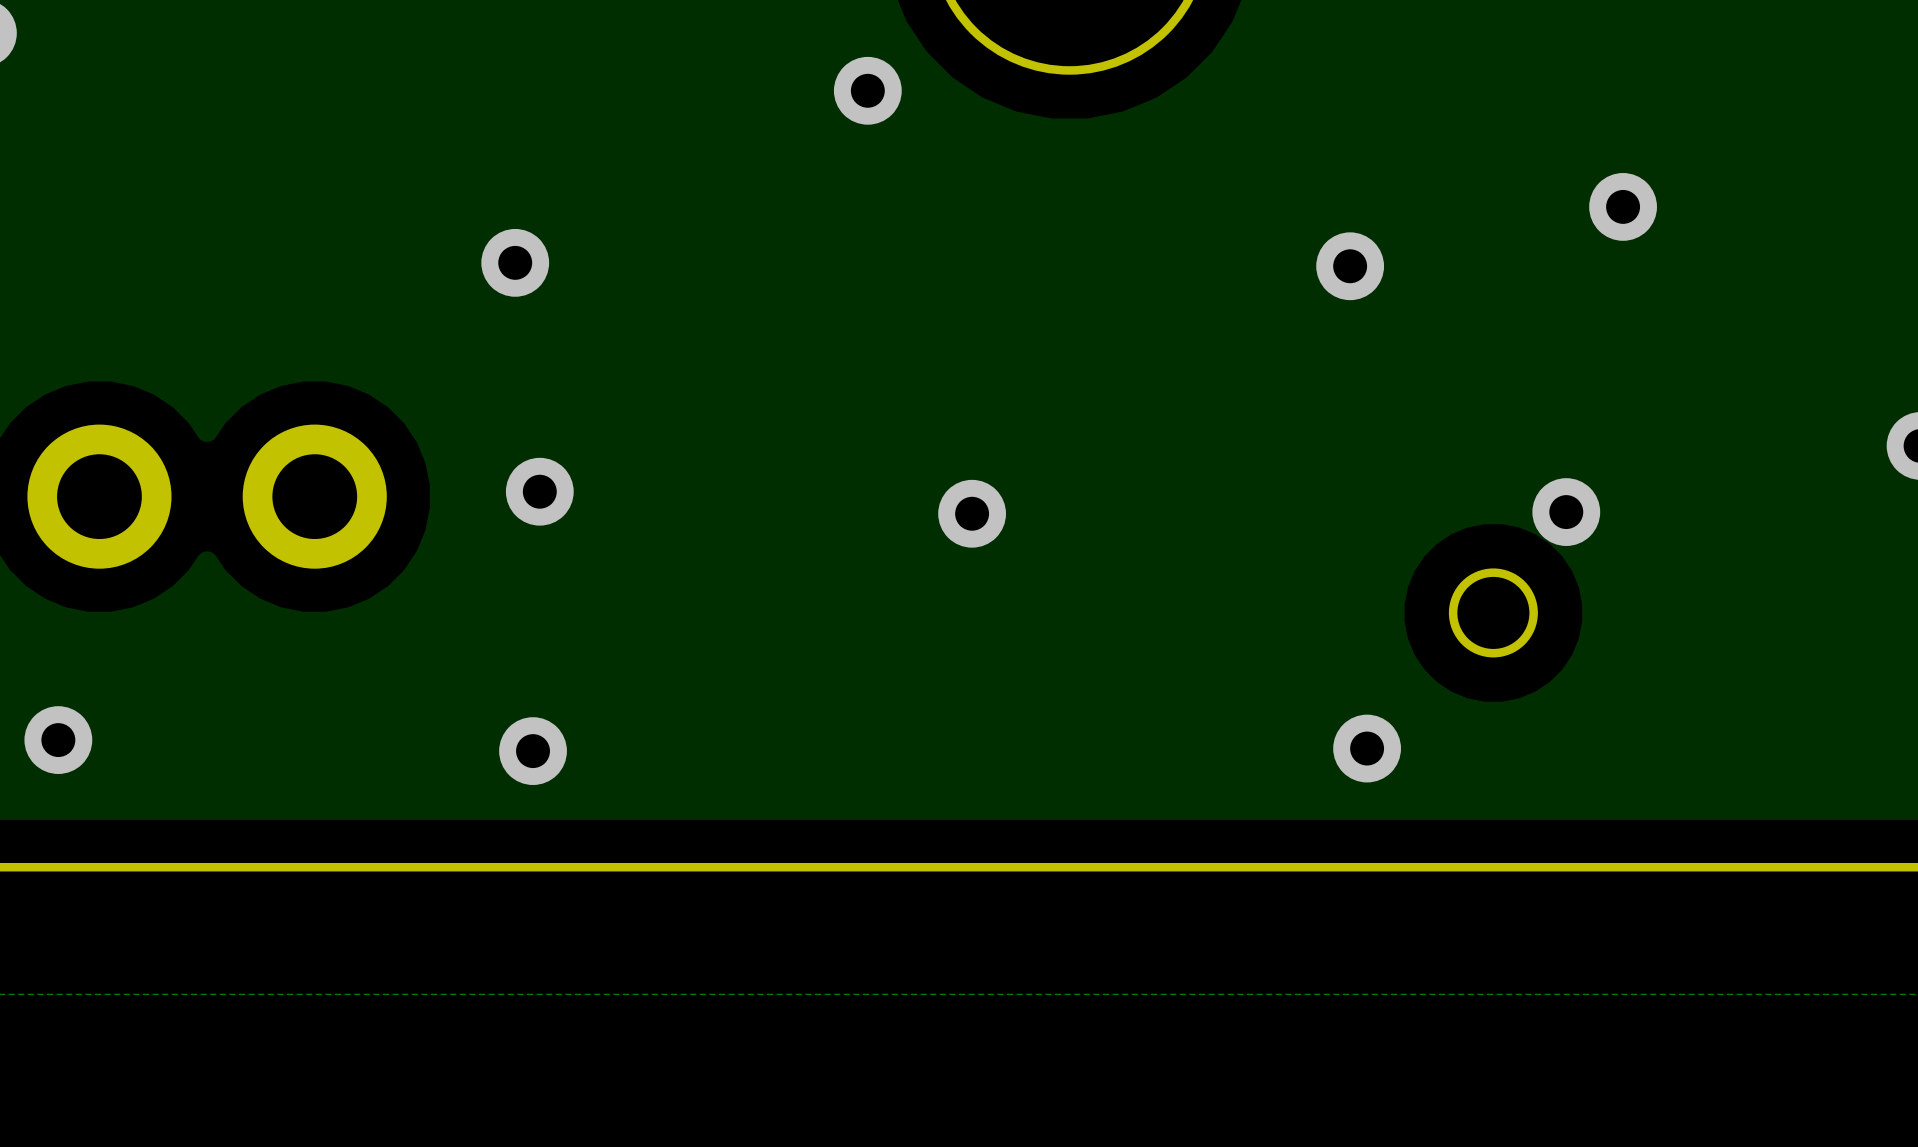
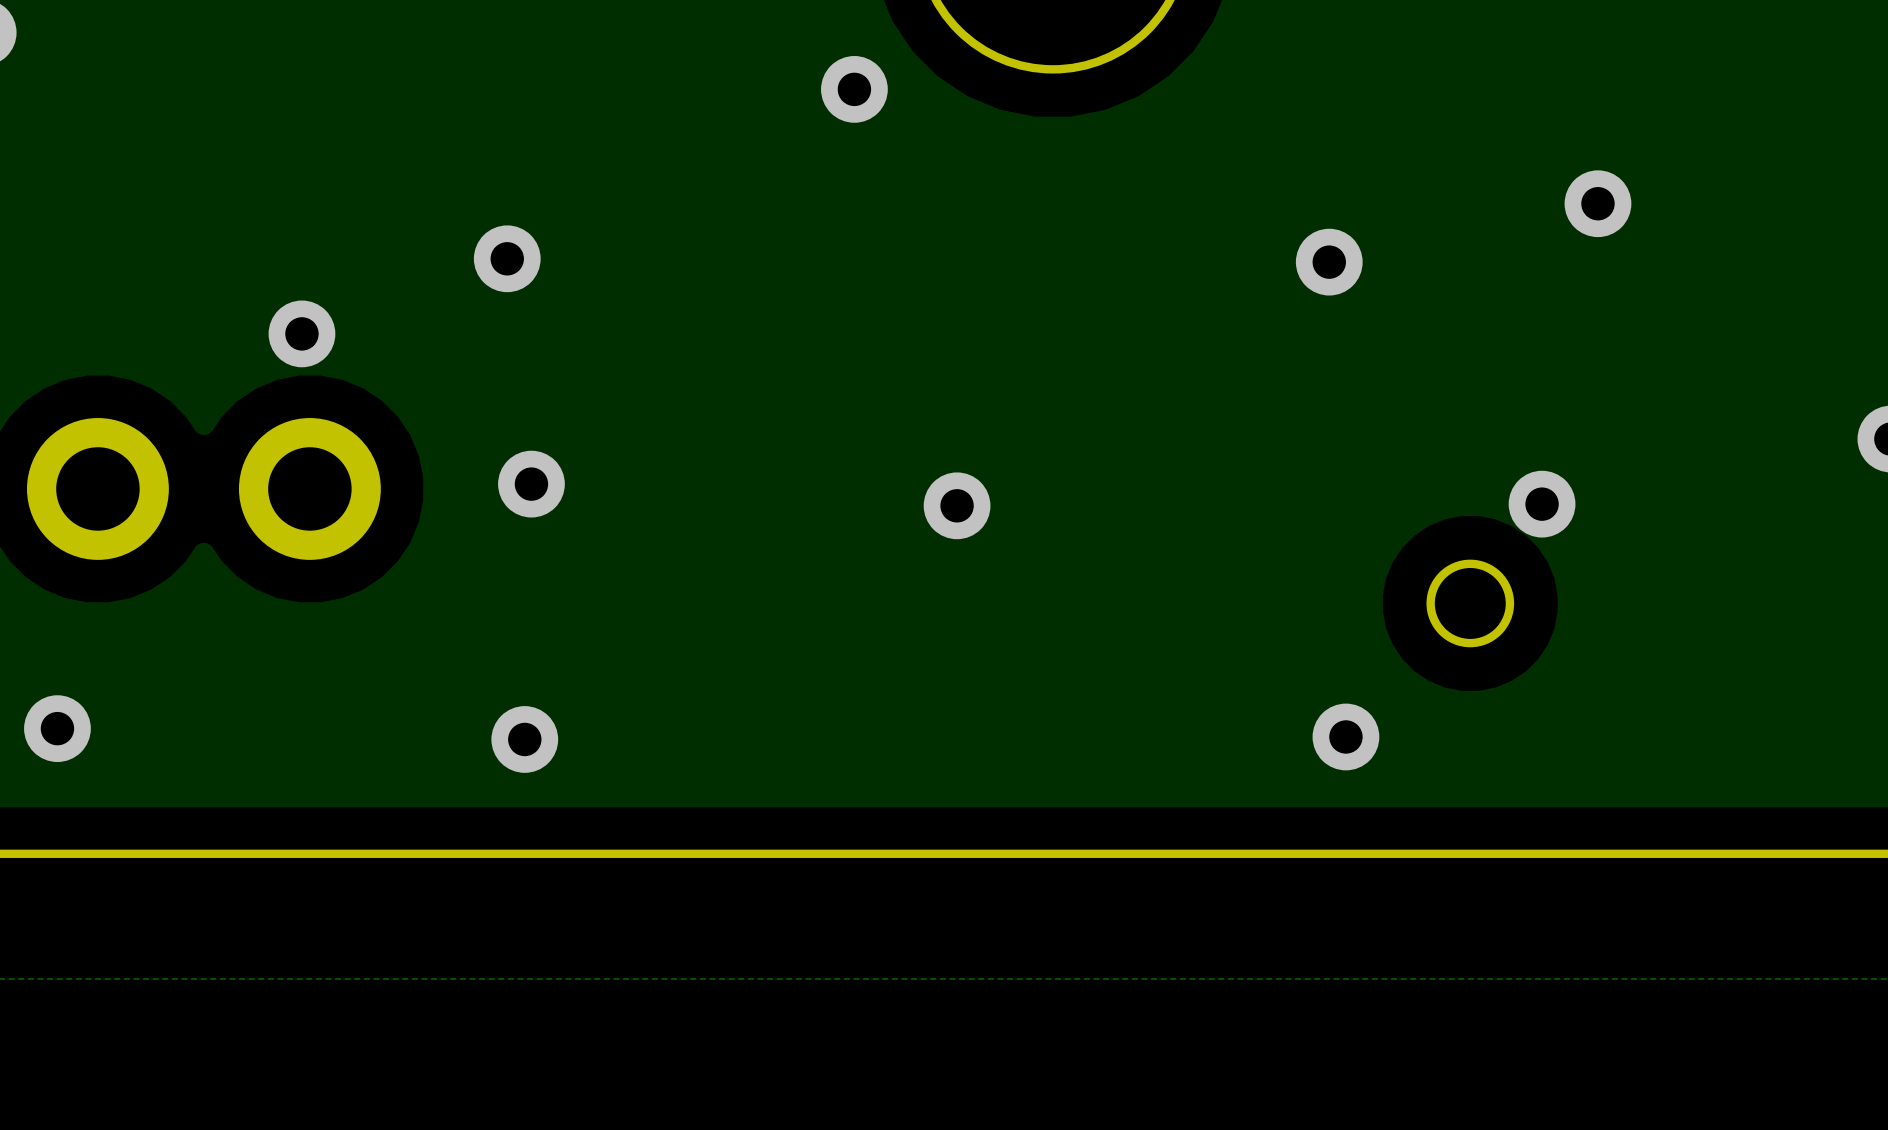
via: none -> (301, 333)

